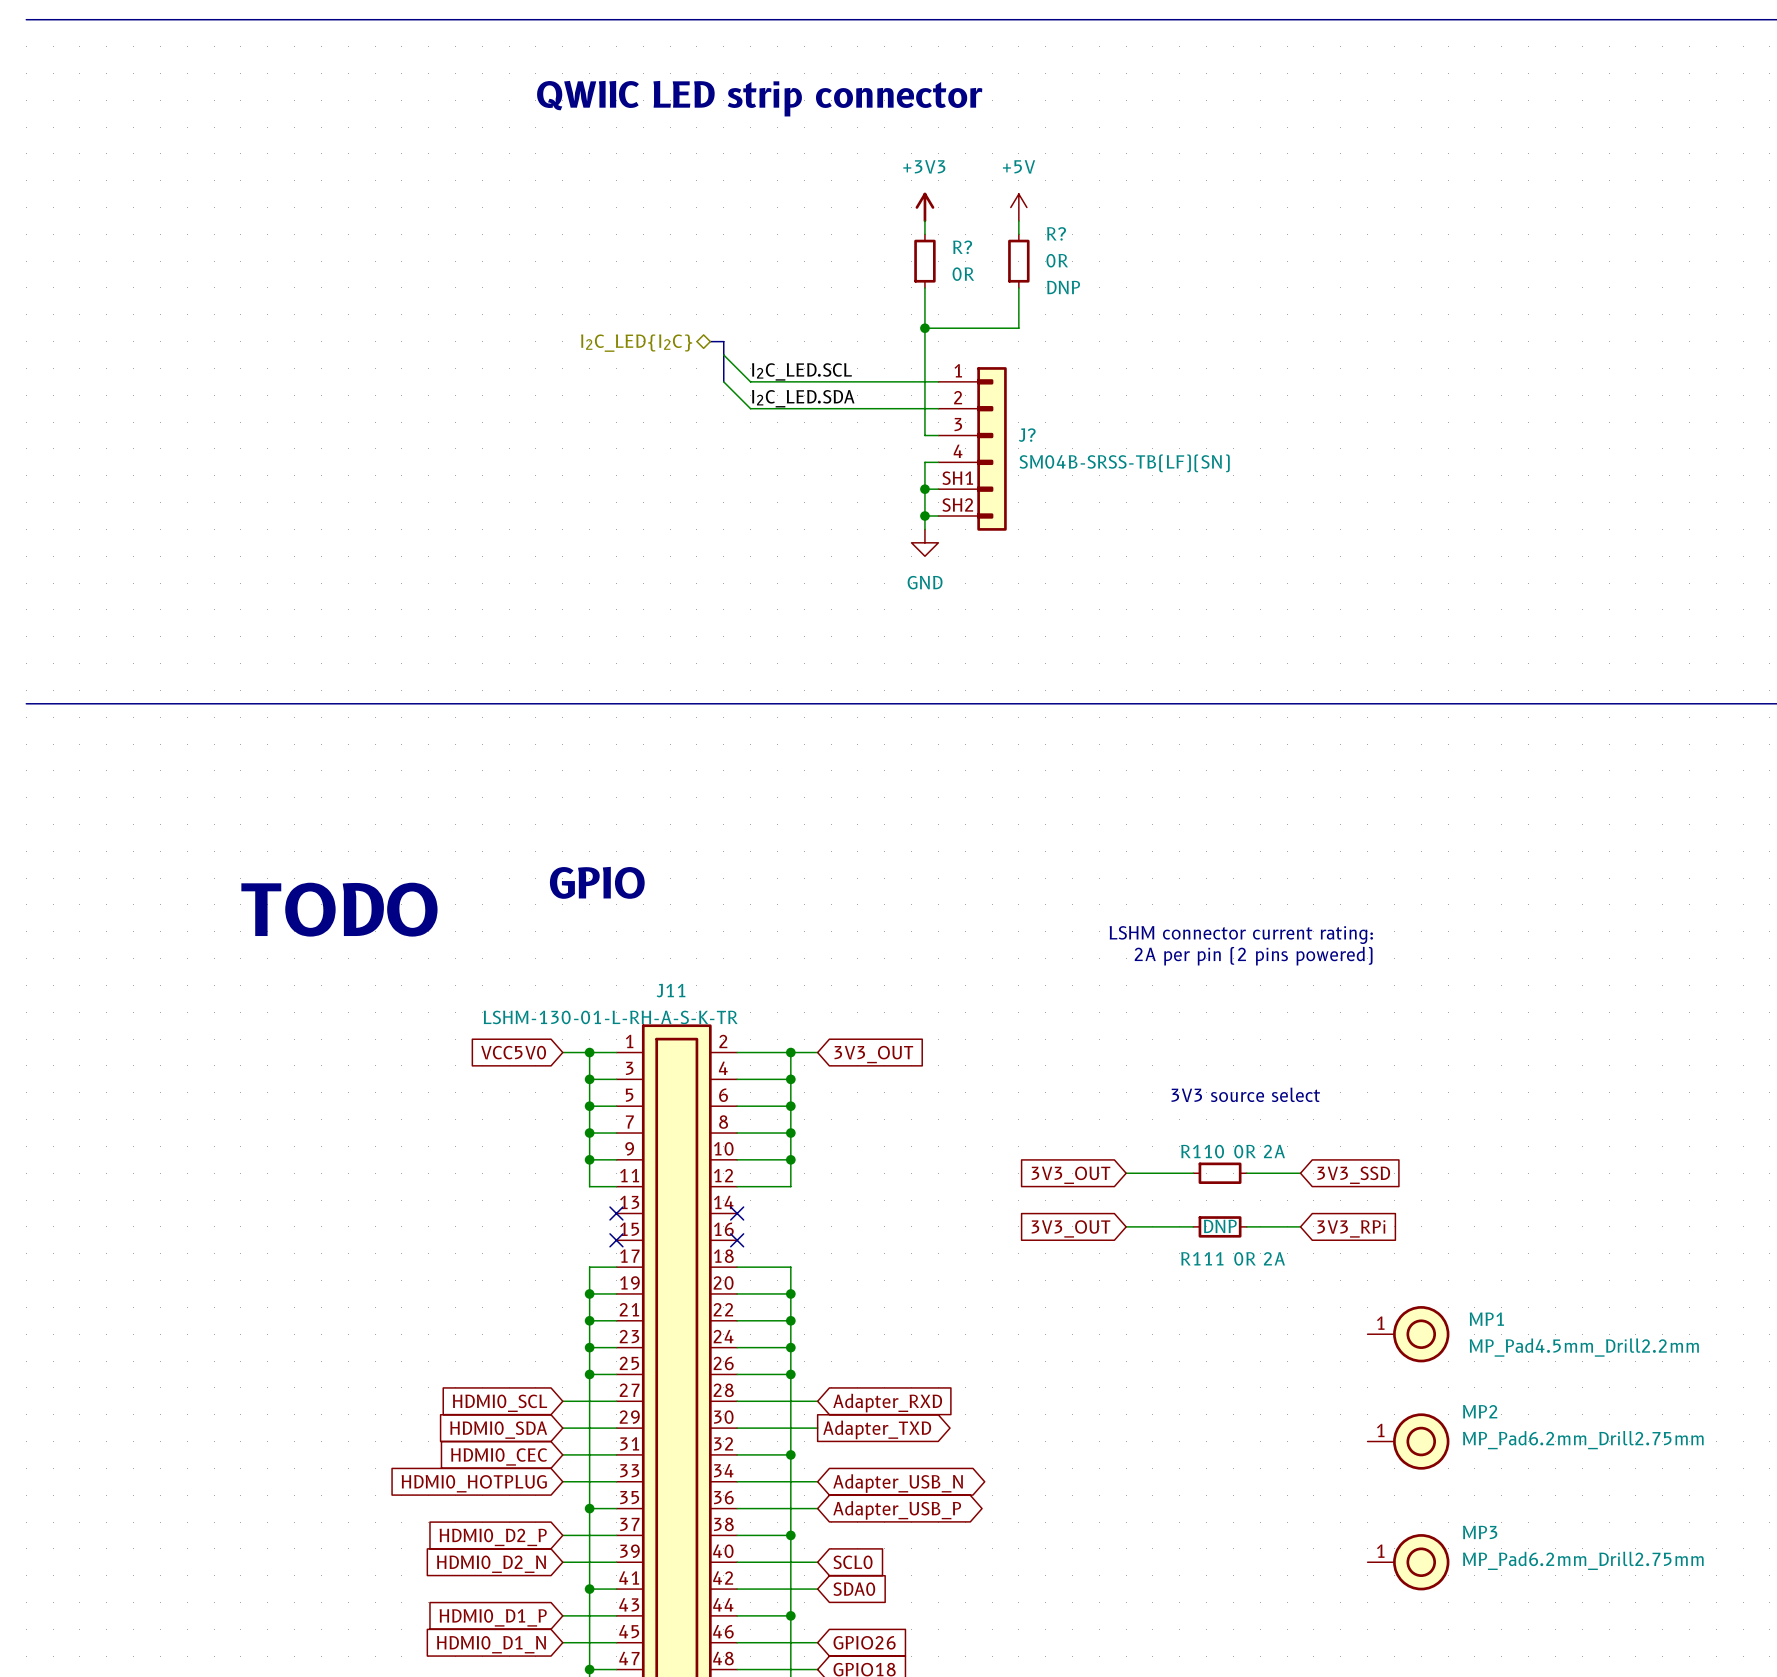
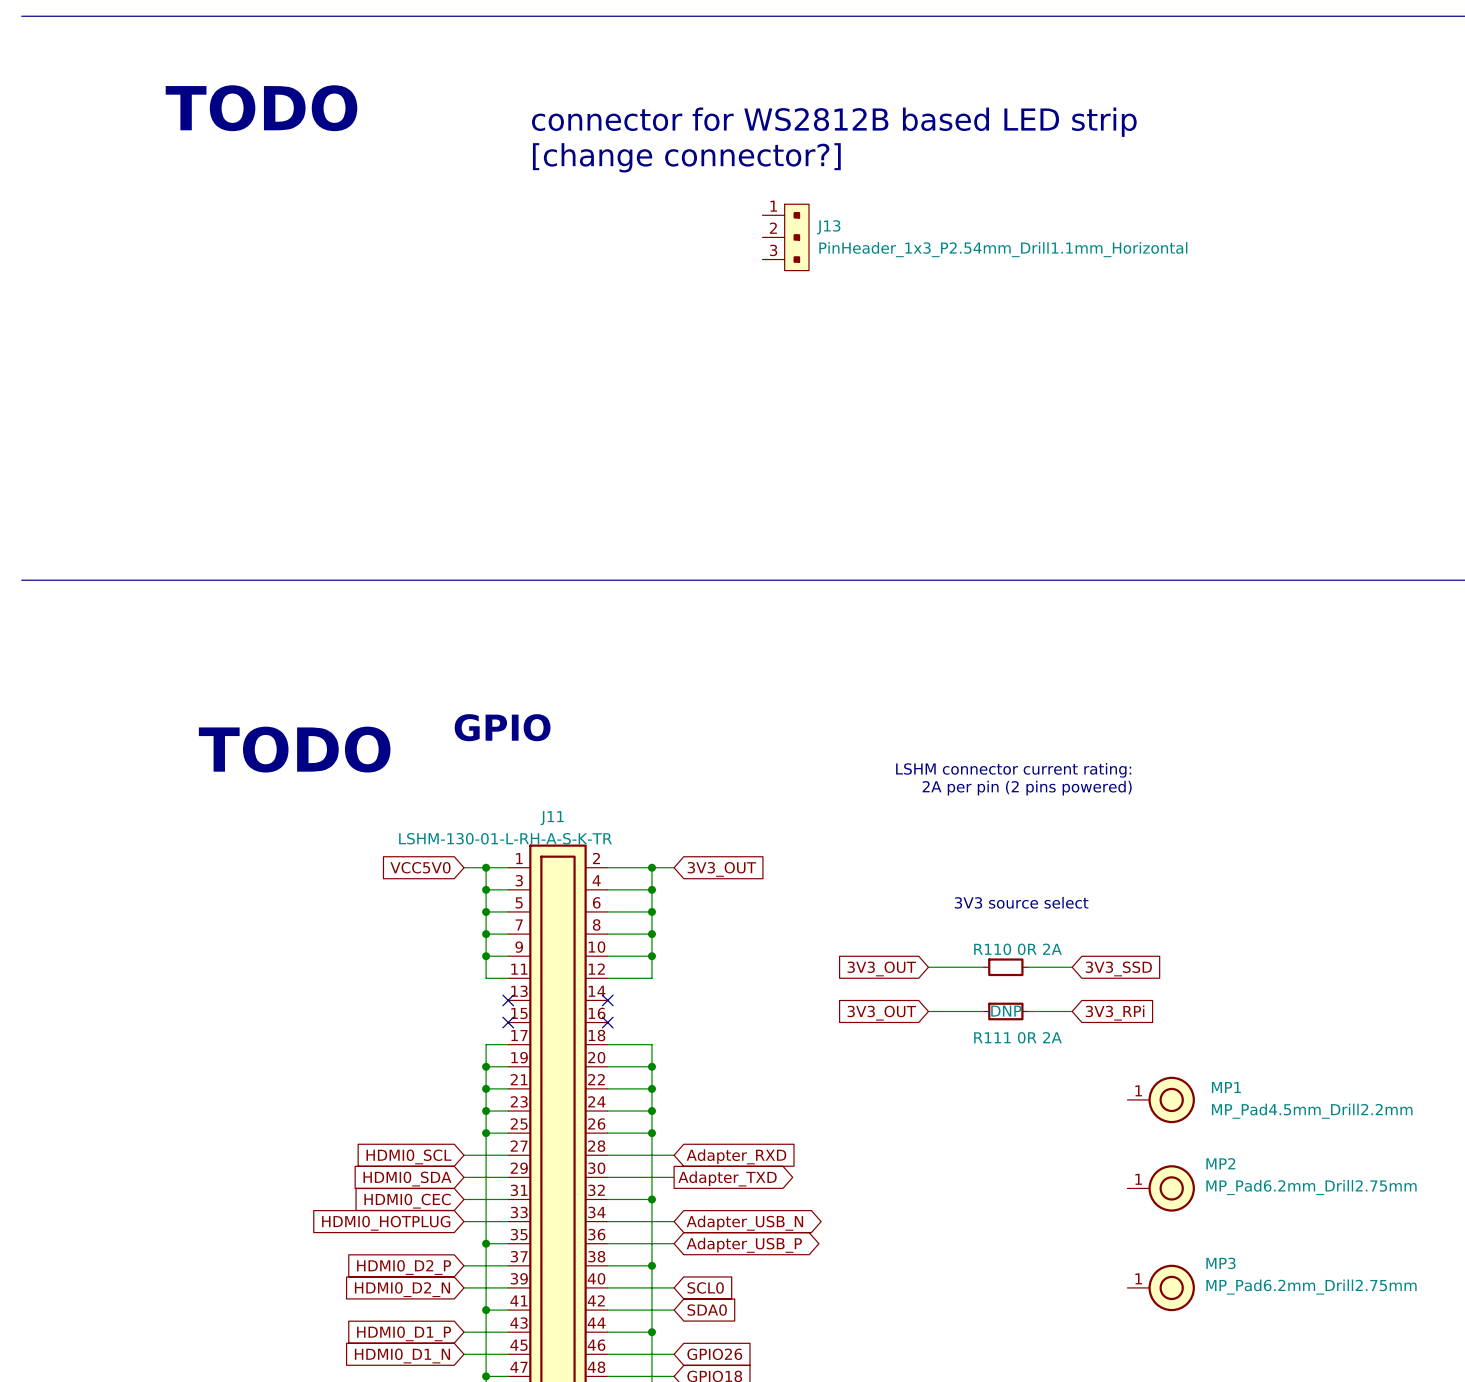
text: QWIIC LED strip connector (759, 98) -> none
text: none -> TODO (261, 108)
text: none -> connector for WS2812B based LED strip (834, 122)
text: none -> [change connector?] (686, 157)
power symbol: +3V3 (924, 207) -> none
power symbol: +5V (1018, 207) -> none
wire: (924, 220) (924, 234) -> none
wire: (1018, 220) (1018, 234) -> none
R?: (924, 261) -> none
R?: (1018, 261) -> none
wire: (924, 287) (924, 435) (938, 435) -> none
J13: none -> PinHeader_1x3_P2.54mm_Drill1.1mm_Horizontal (785, 237)
wire: (1018, 287) (1018, 328) (924, 328) -> none
junction: (924, 328) -> none
bus: (710, 341) (723, 341) (723, 381) -> none
hierarchical label: I2C_LED{I2C} (636, 343) -> none
wire: (723, 355) (750, 381) (938, 381) -> none
label: I2C_LED.SCL (801, 371) -> none
wire: (723, 381) (750, 408) (938, 408) -> none
label: I2C_LED.SDA (803, 398) -> none
J?: (972, 448) -> none
wire: (938, 462) (924, 462) (924, 529) -> none
wire: (924, 489) (938, 489) -> none
junction: (924, 489) -> none
wire: (924, 516) (938, 516) -> none
junction: (924, 516) -> none
power symbol: GND (924, 542) -> none

